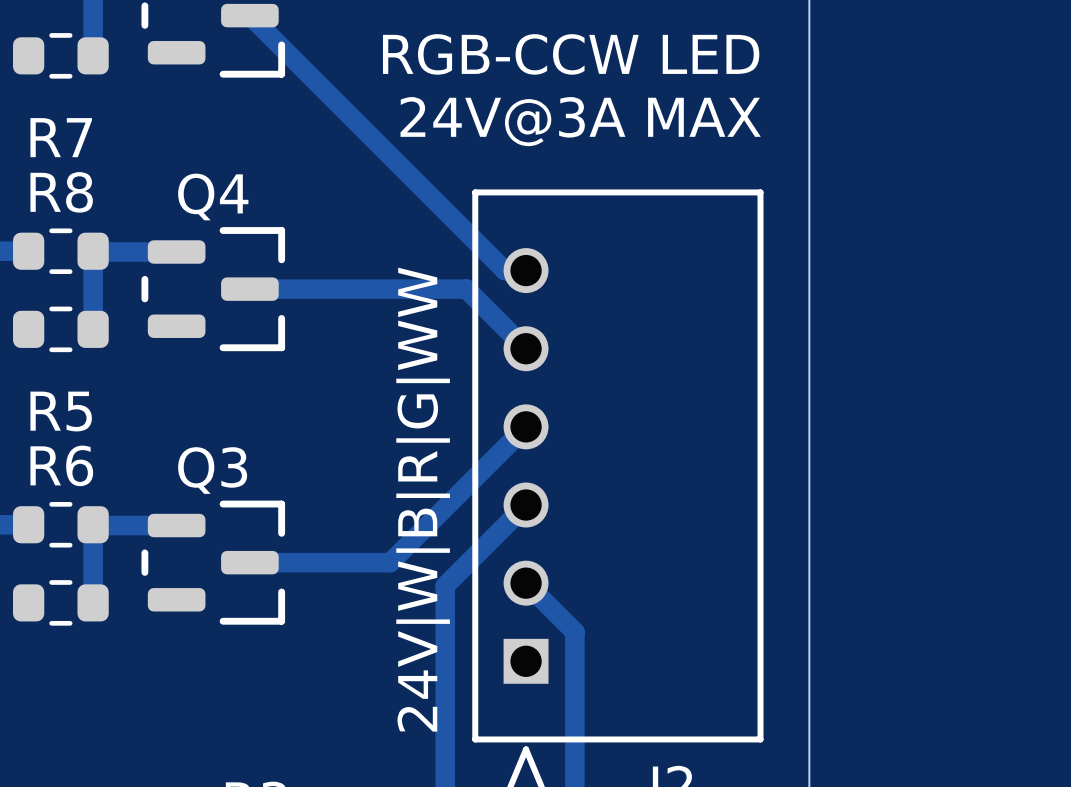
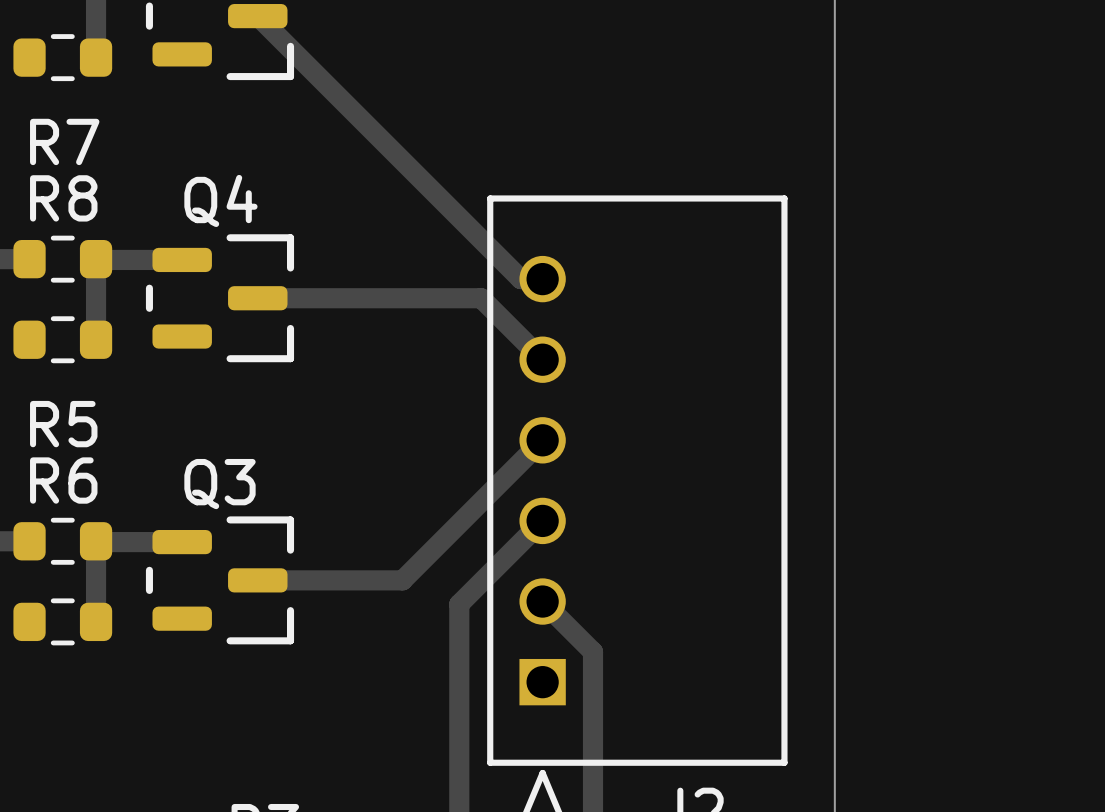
text: RGB-CCW LED (571, 54) -> none
text: 24V@3A MAX (580, 121) -> none
text: 24V|W|B|R|G|WW (423, 499) -> none

